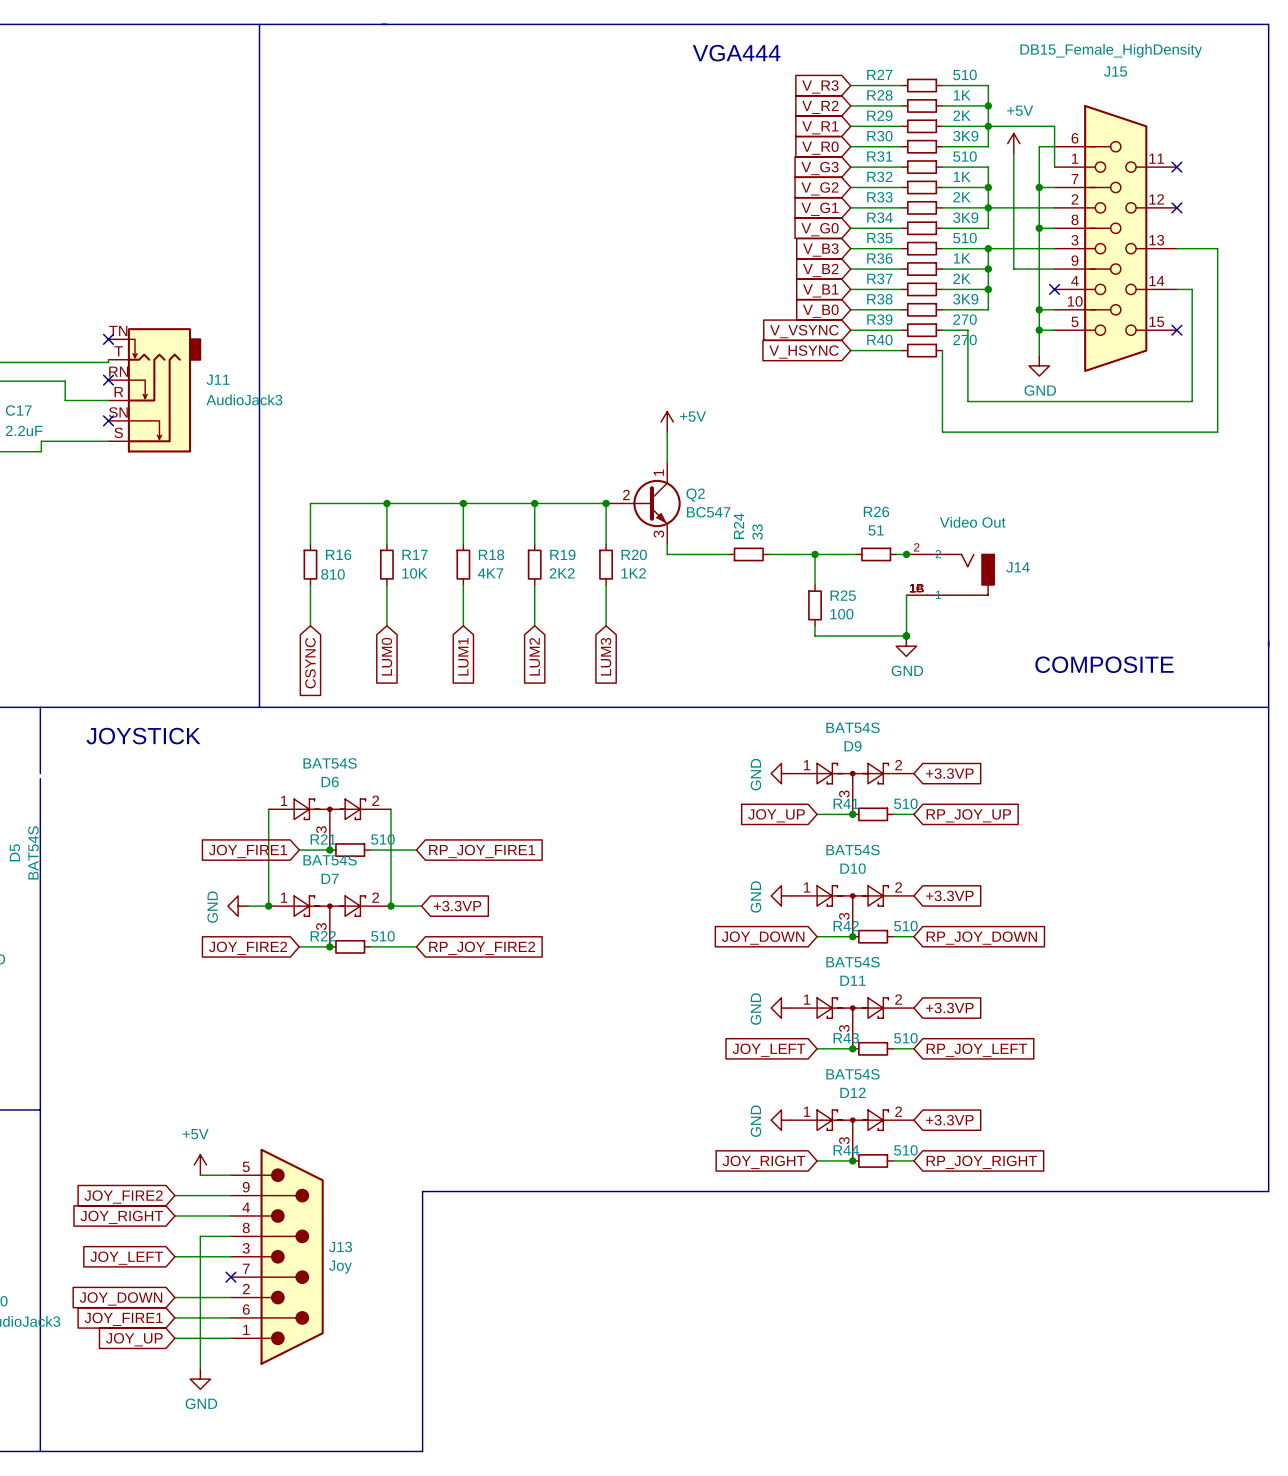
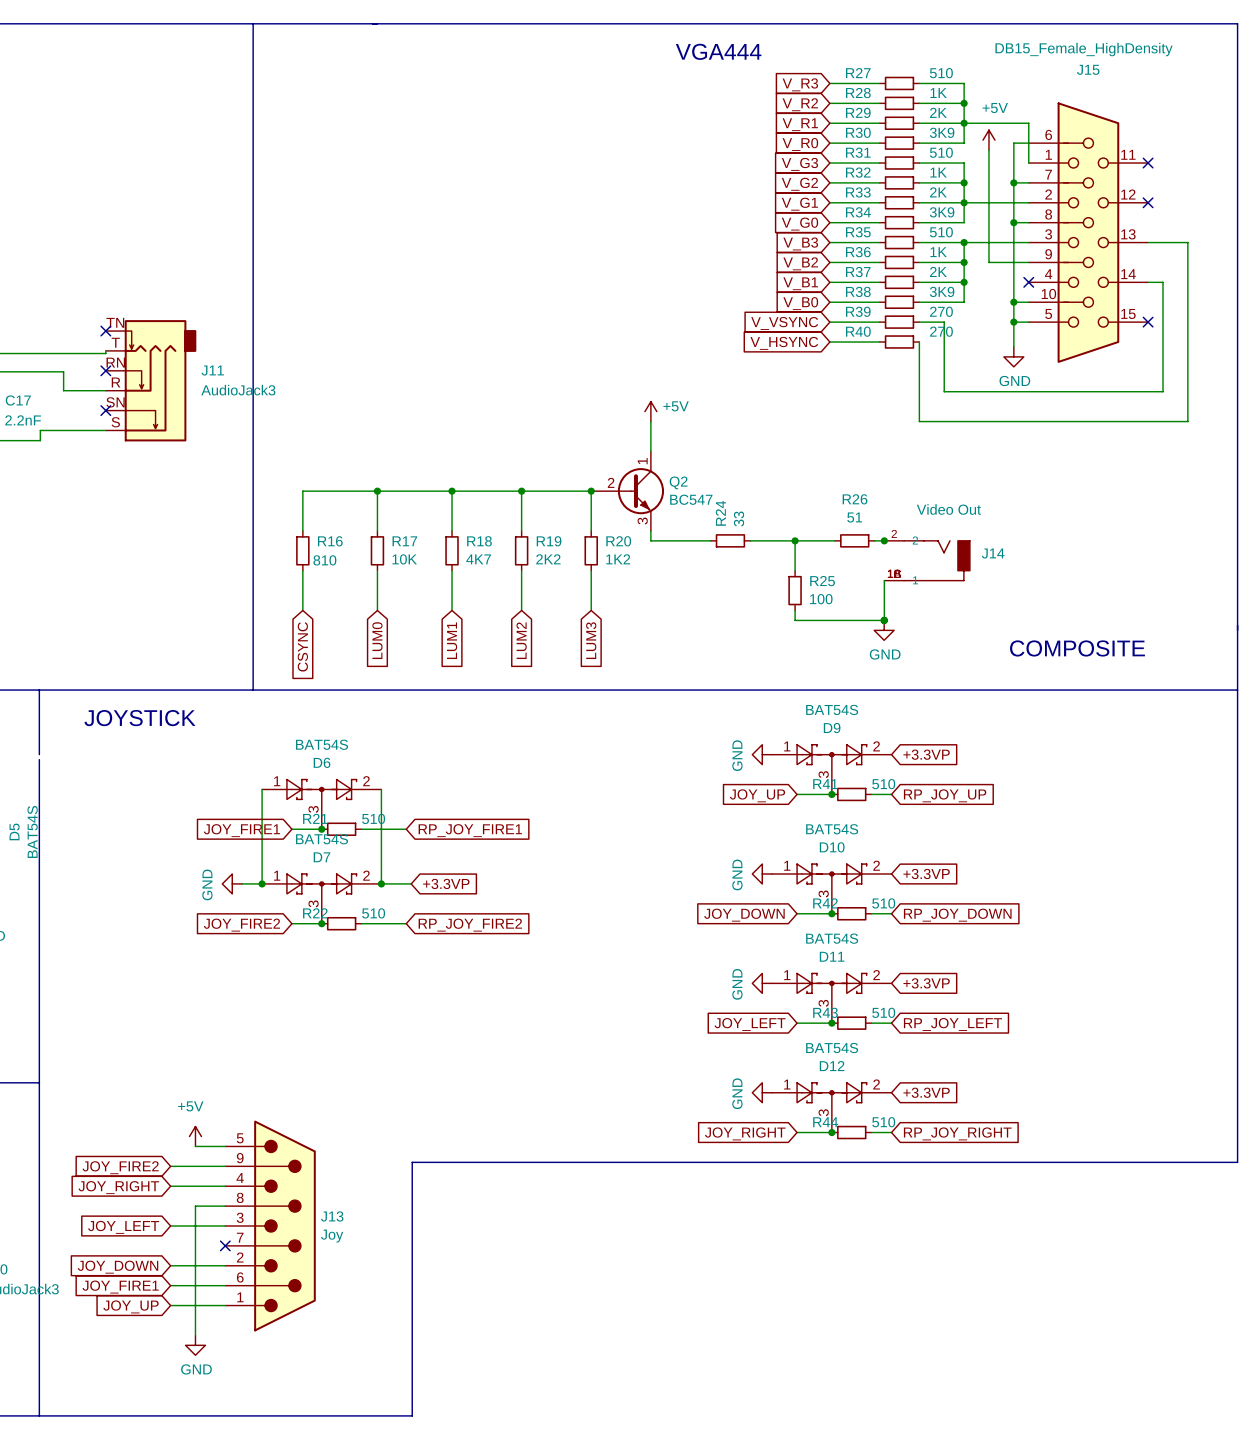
C17 value: 2.2uF (24, 430) -> 2.2nF (23, 420)

